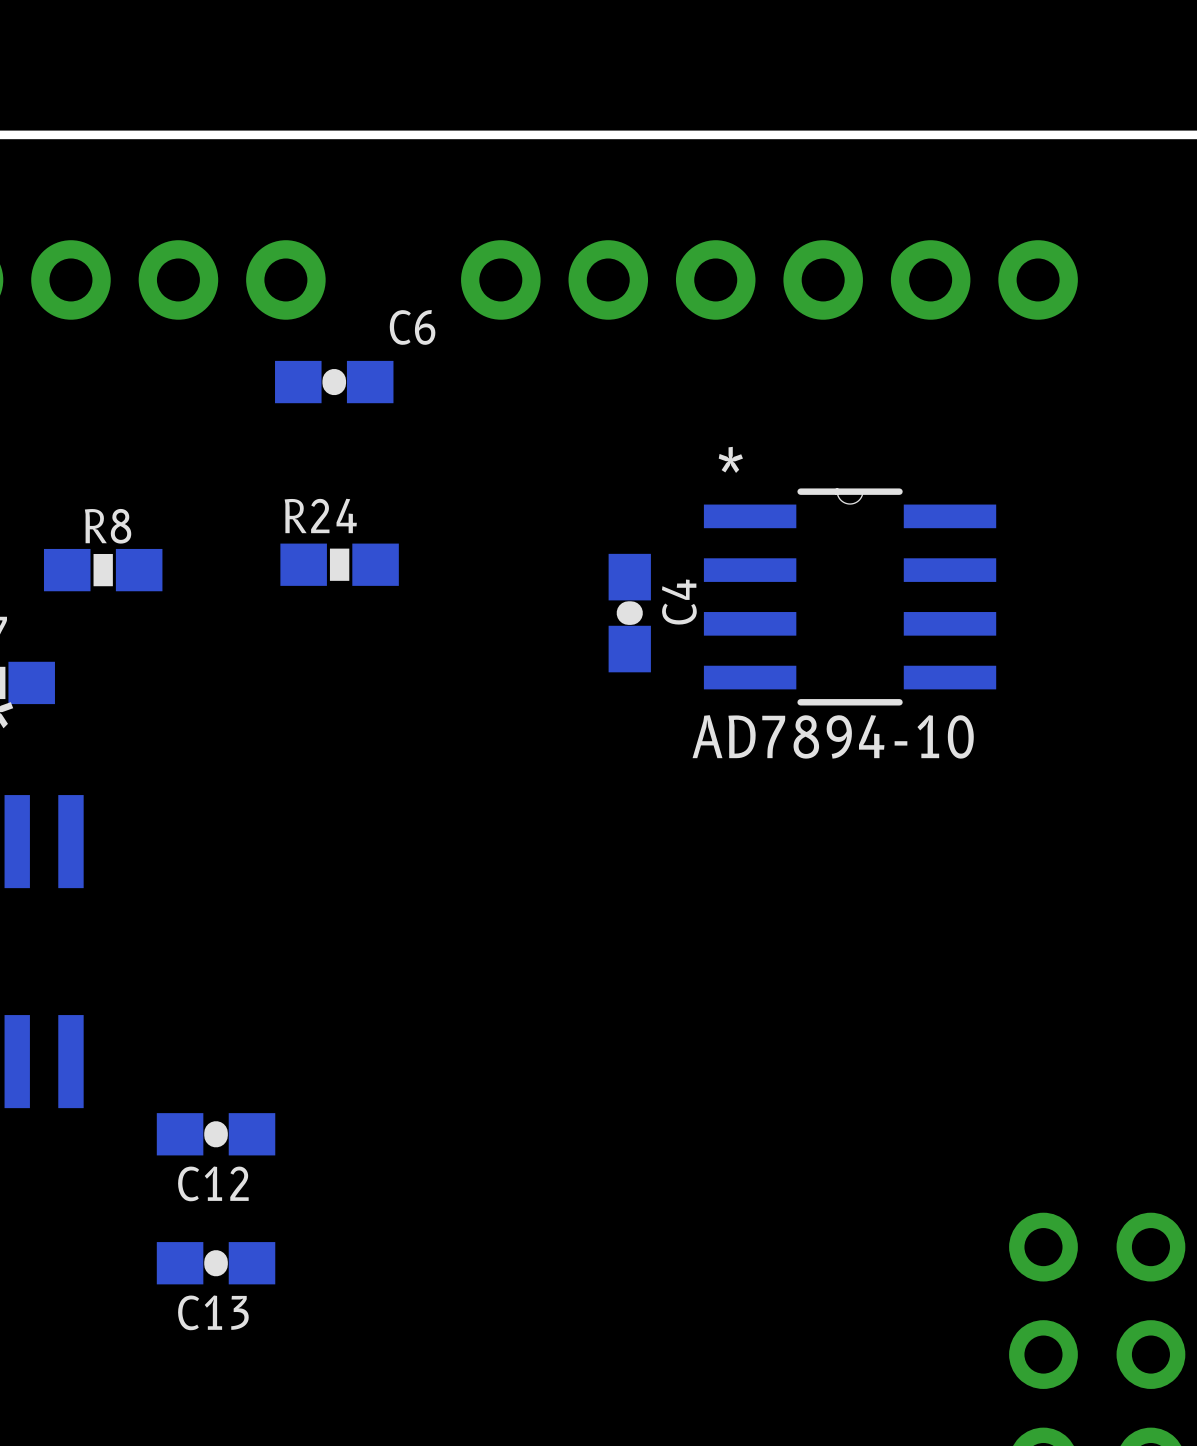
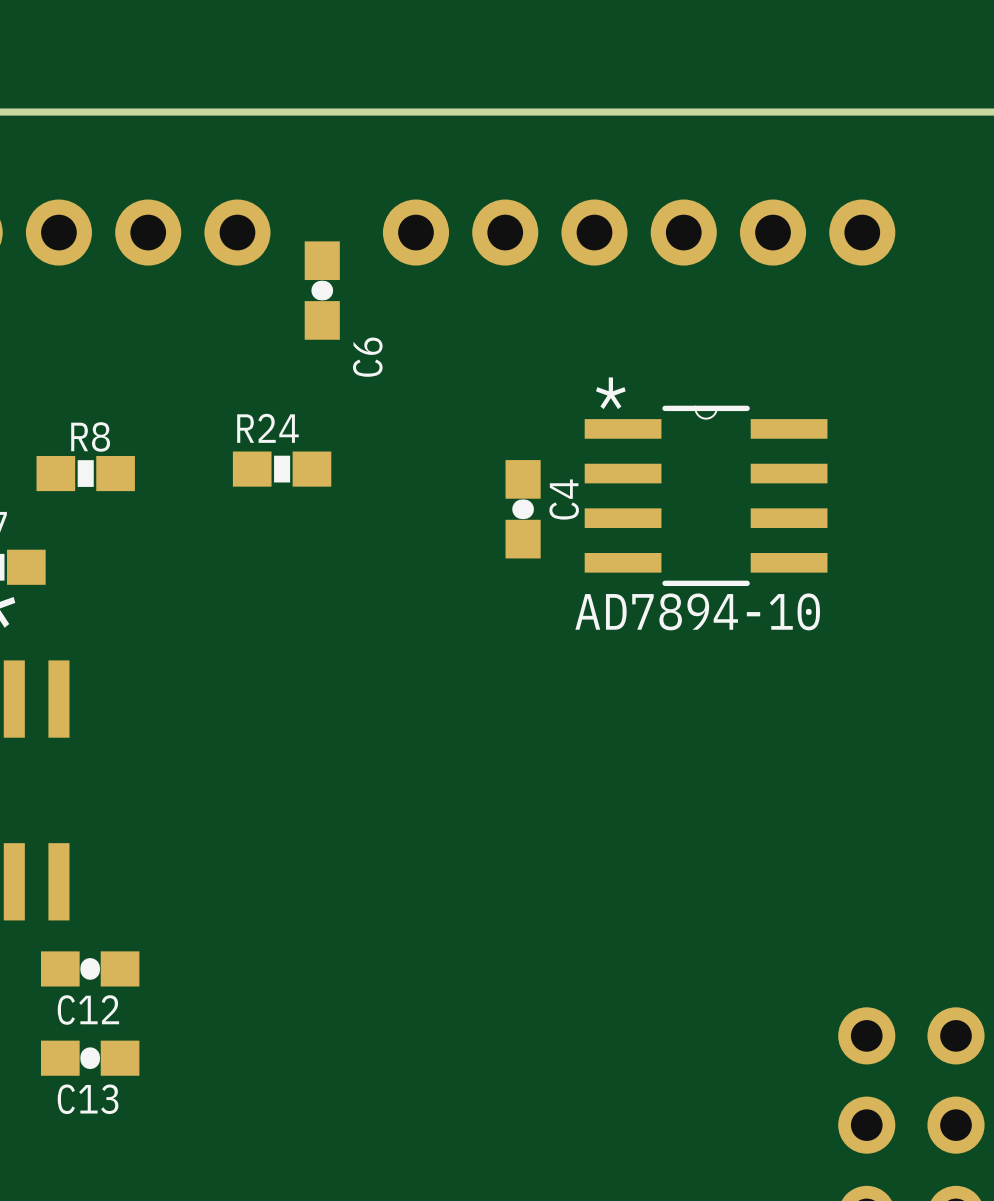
C6 rotation: 0° (334, 382) -> 90° clockwise (322, 290)
C12 position: (216, 1134) -> (90, 968)
C13 position: (216, 1263) -> (90, 1058)

